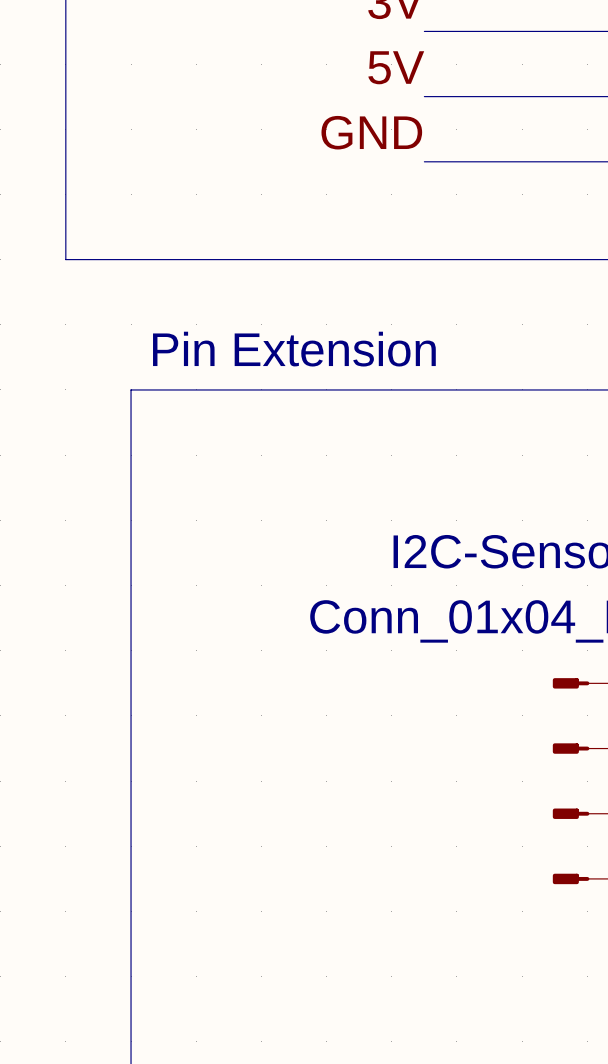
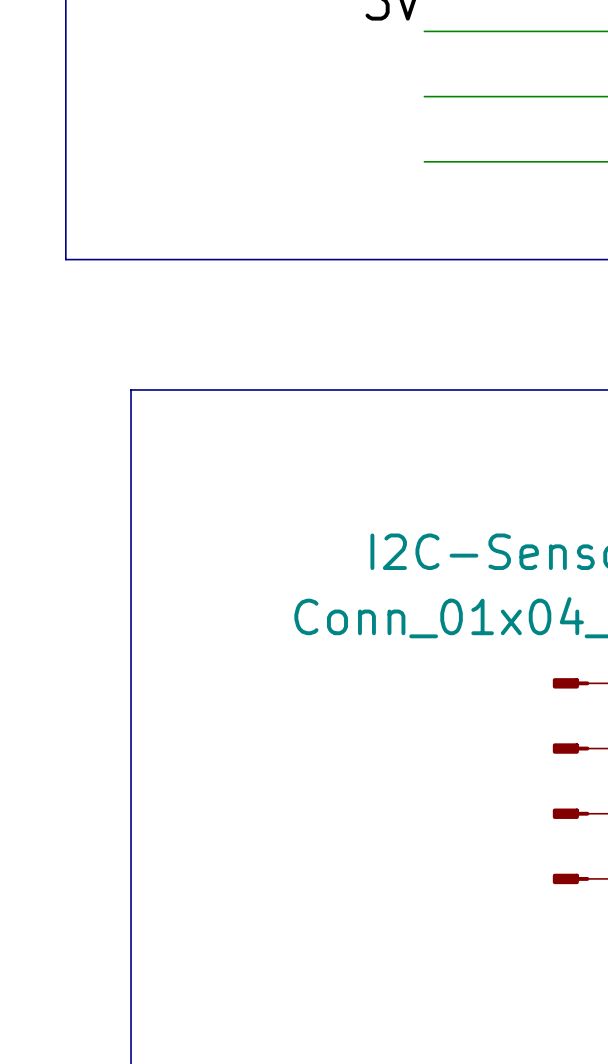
label: 5V (396, 67) -> none
label: GND (371, 132) -> none
text: Pin Extension (294, 349) -> none

